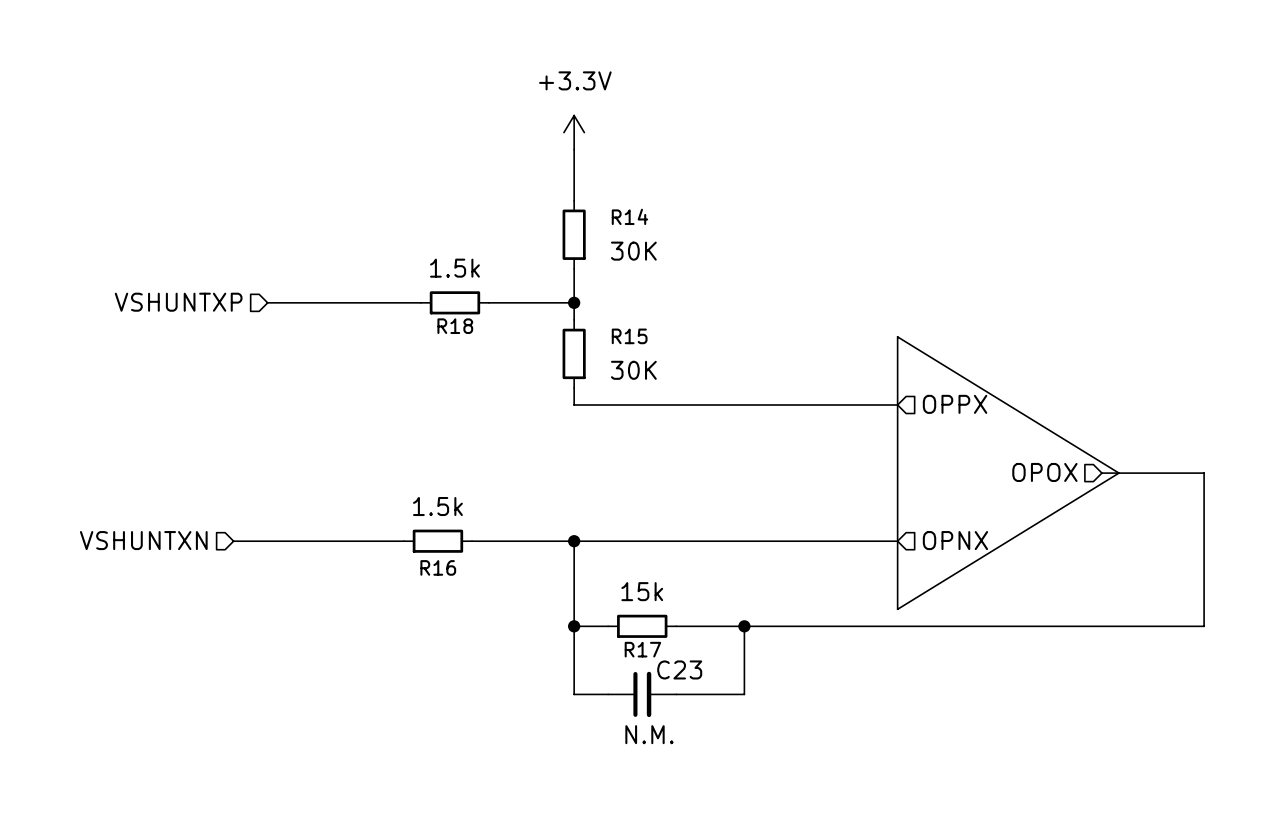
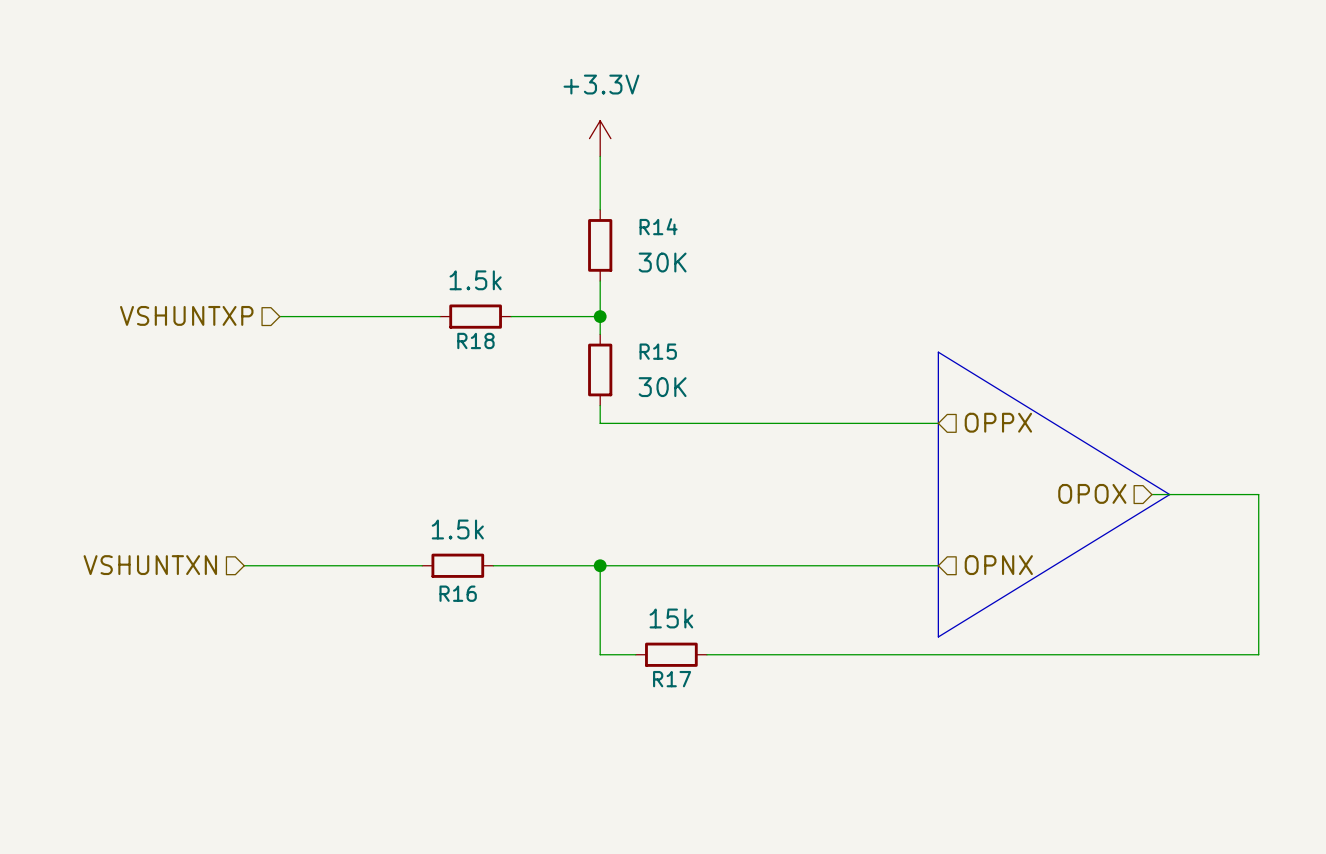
wire: (574, 626) (574, 694) (608, 694) -> none
junction: (574, 626) -> none
wire: (744, 626) (744, 694) (676, 694) -> none
junction: (744, 626) -> none
C23: N.M. (642, 694) -> none

